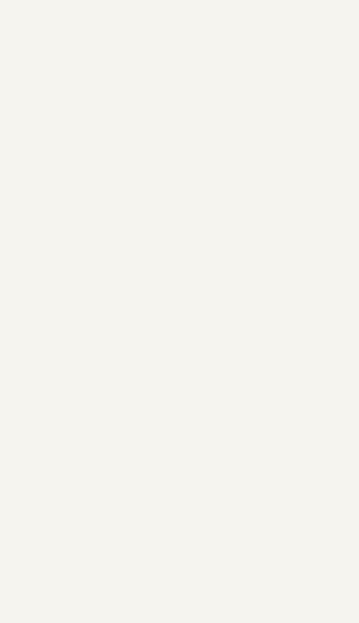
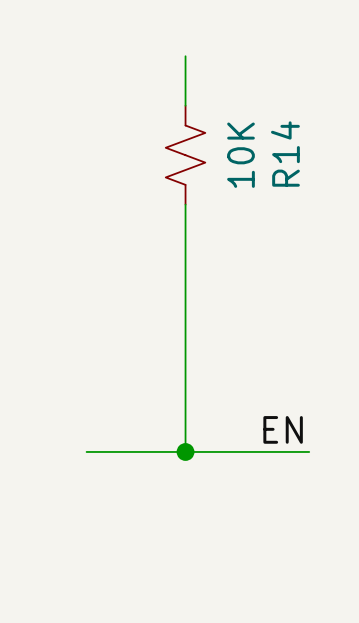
wire: none -> (185, 56) (185, 105)
R14: none -> 10K (185, 155)
wire: none -> (185, 204) (185, 451)
label: none -> EN (283, 429)
wire: none -> (86, 451) (309, 451)
junction: none -> (185, 451)

